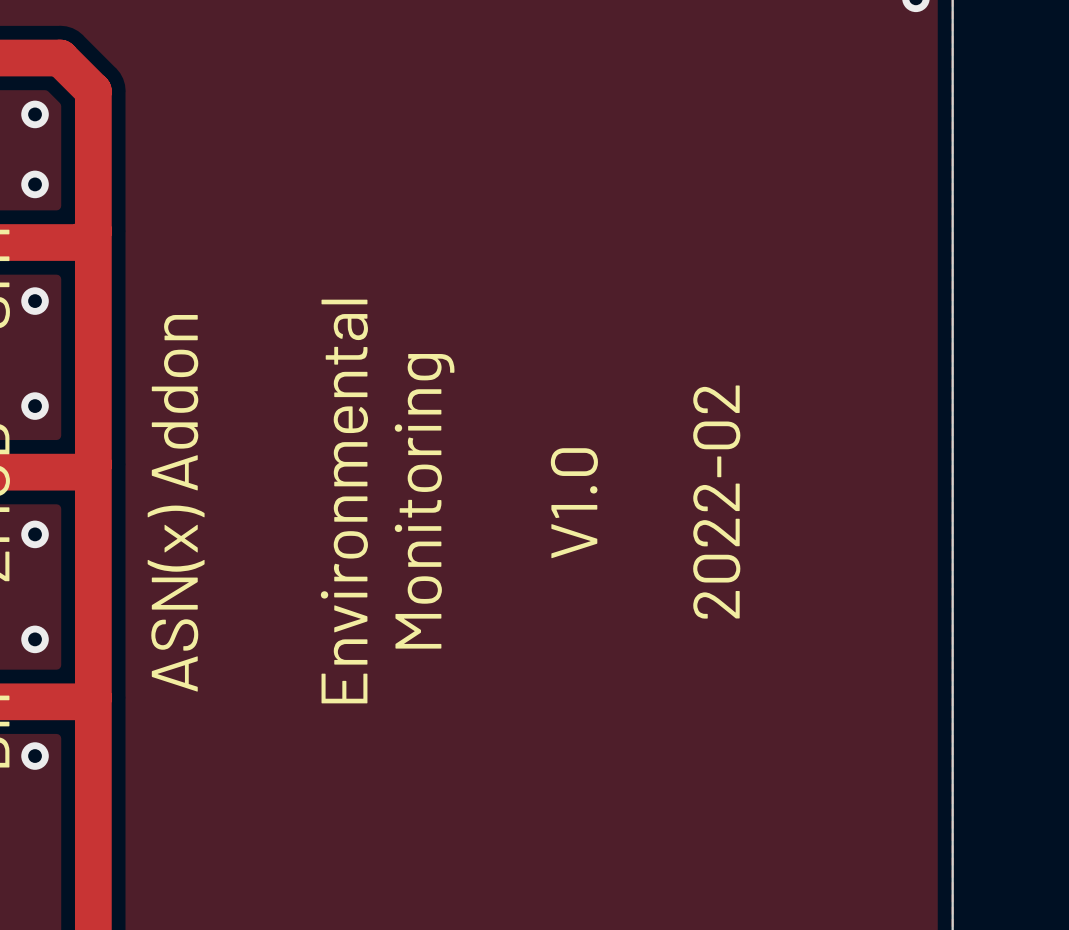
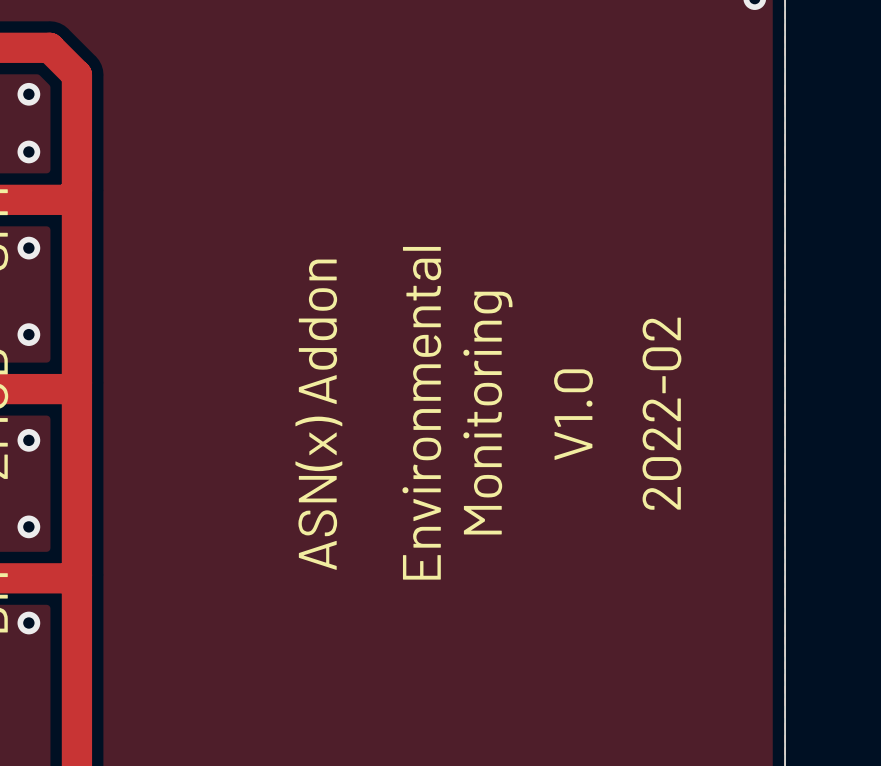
text position: Environmental (344, 501) -> Environmental (421, 413)
text position: Monitoring (424, 501) -> Monitoring (487, 413)
text position: 2022-02 (716, 502) -> 2022-02 (661, 413)
text position: ASN(x) Addon (176, 503) -> ASN(x) Addon (318, 414)
text position: V1.0 (574, 503) -> V1.0 (573, 414)

